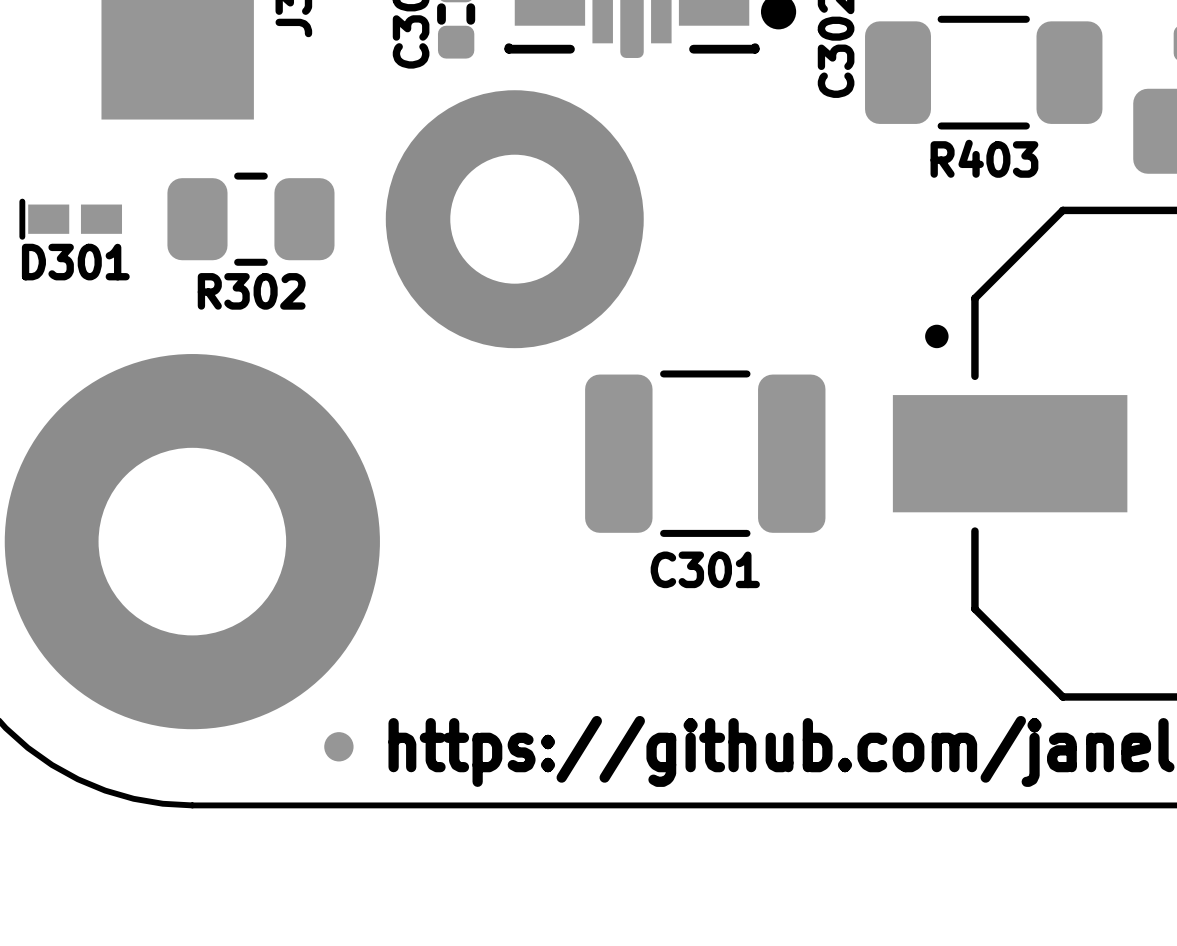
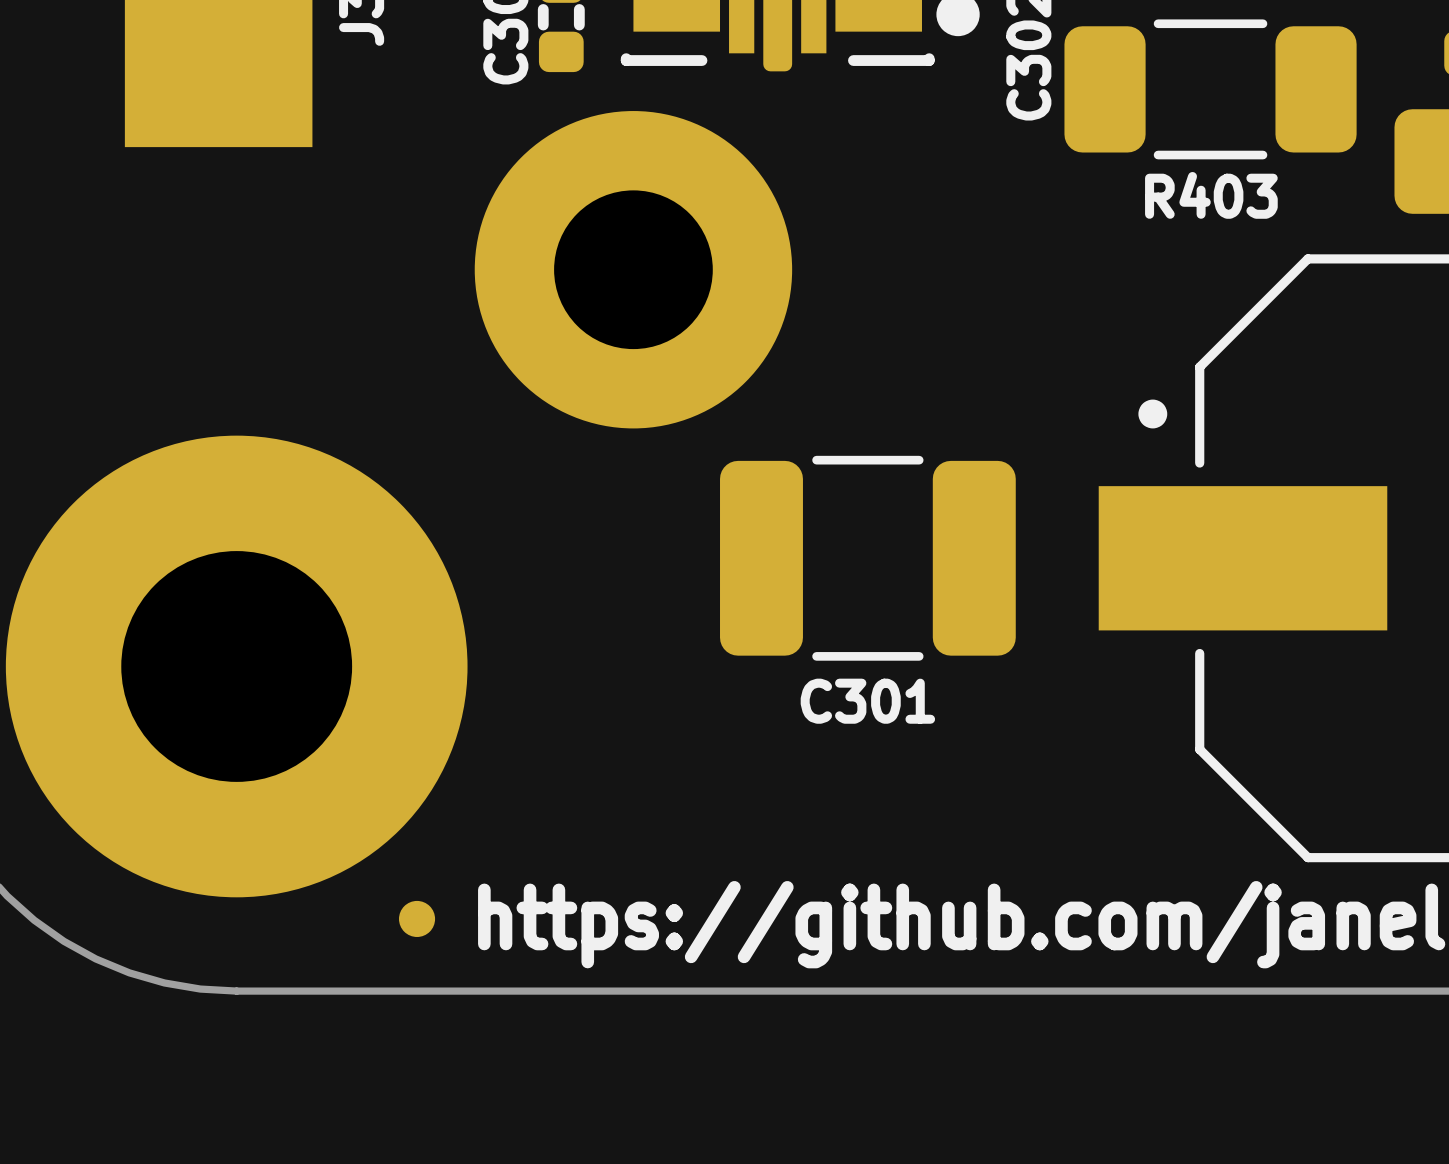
D301: (70, 219) -> none
R302: (250, 219) -> none

